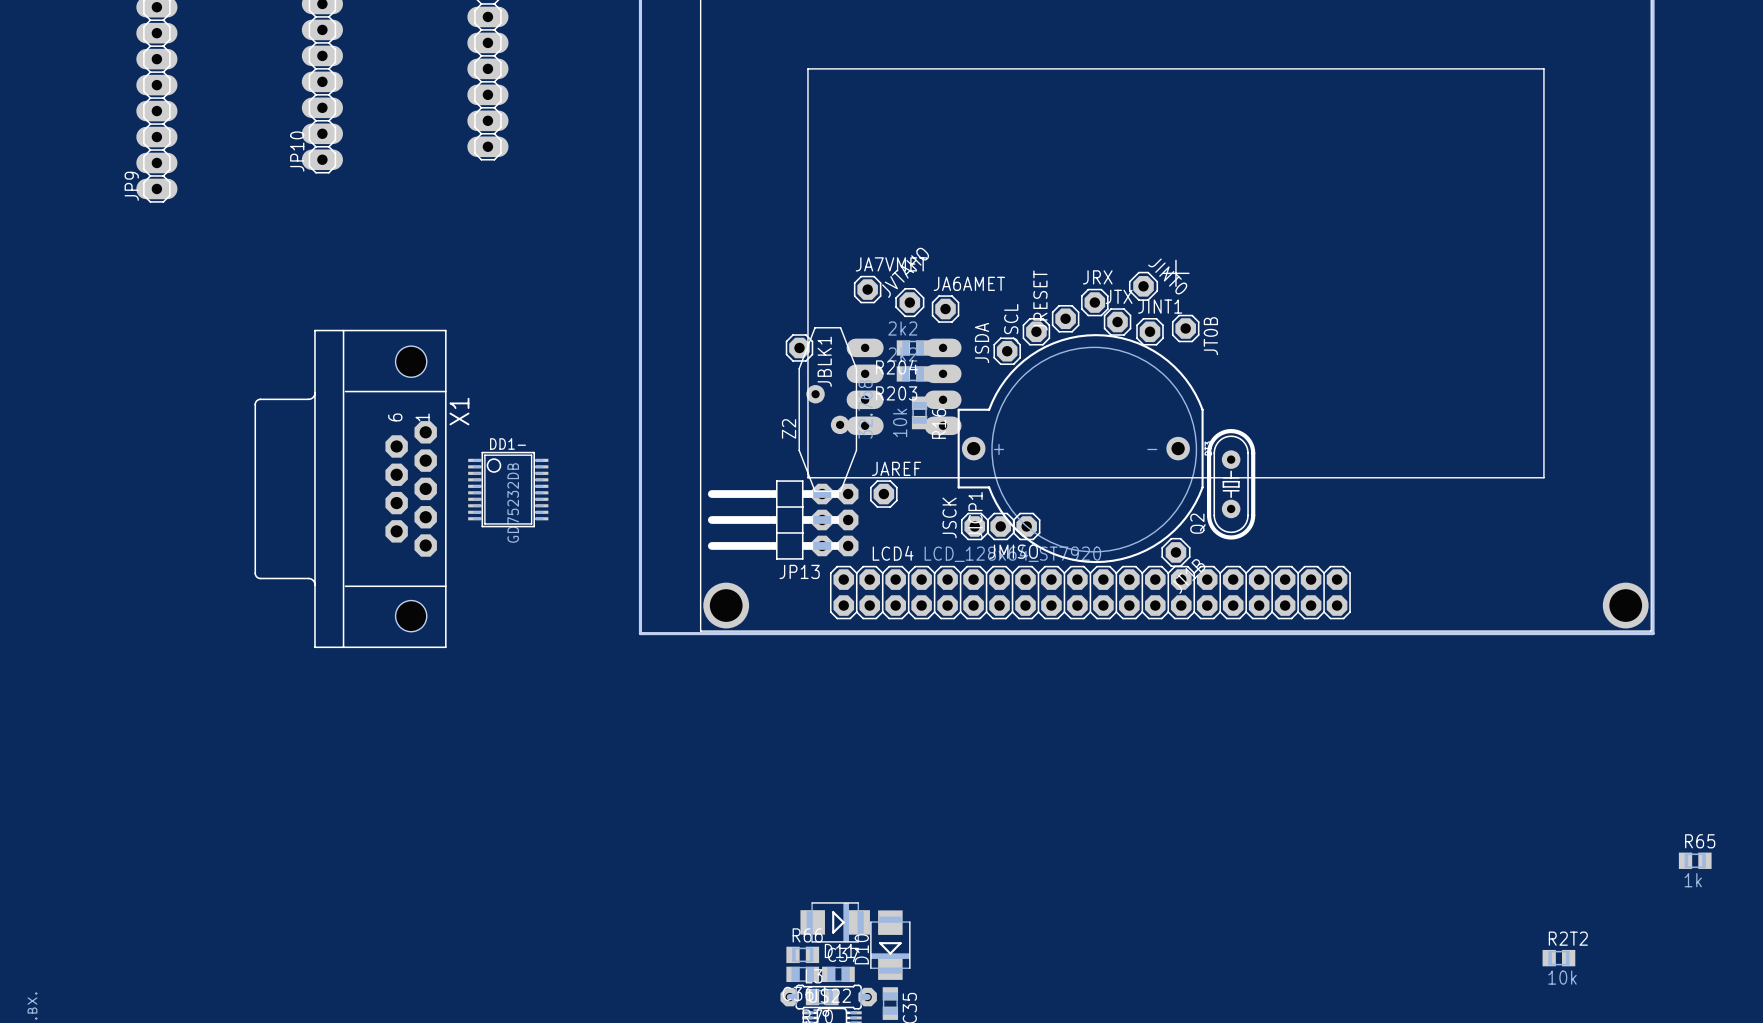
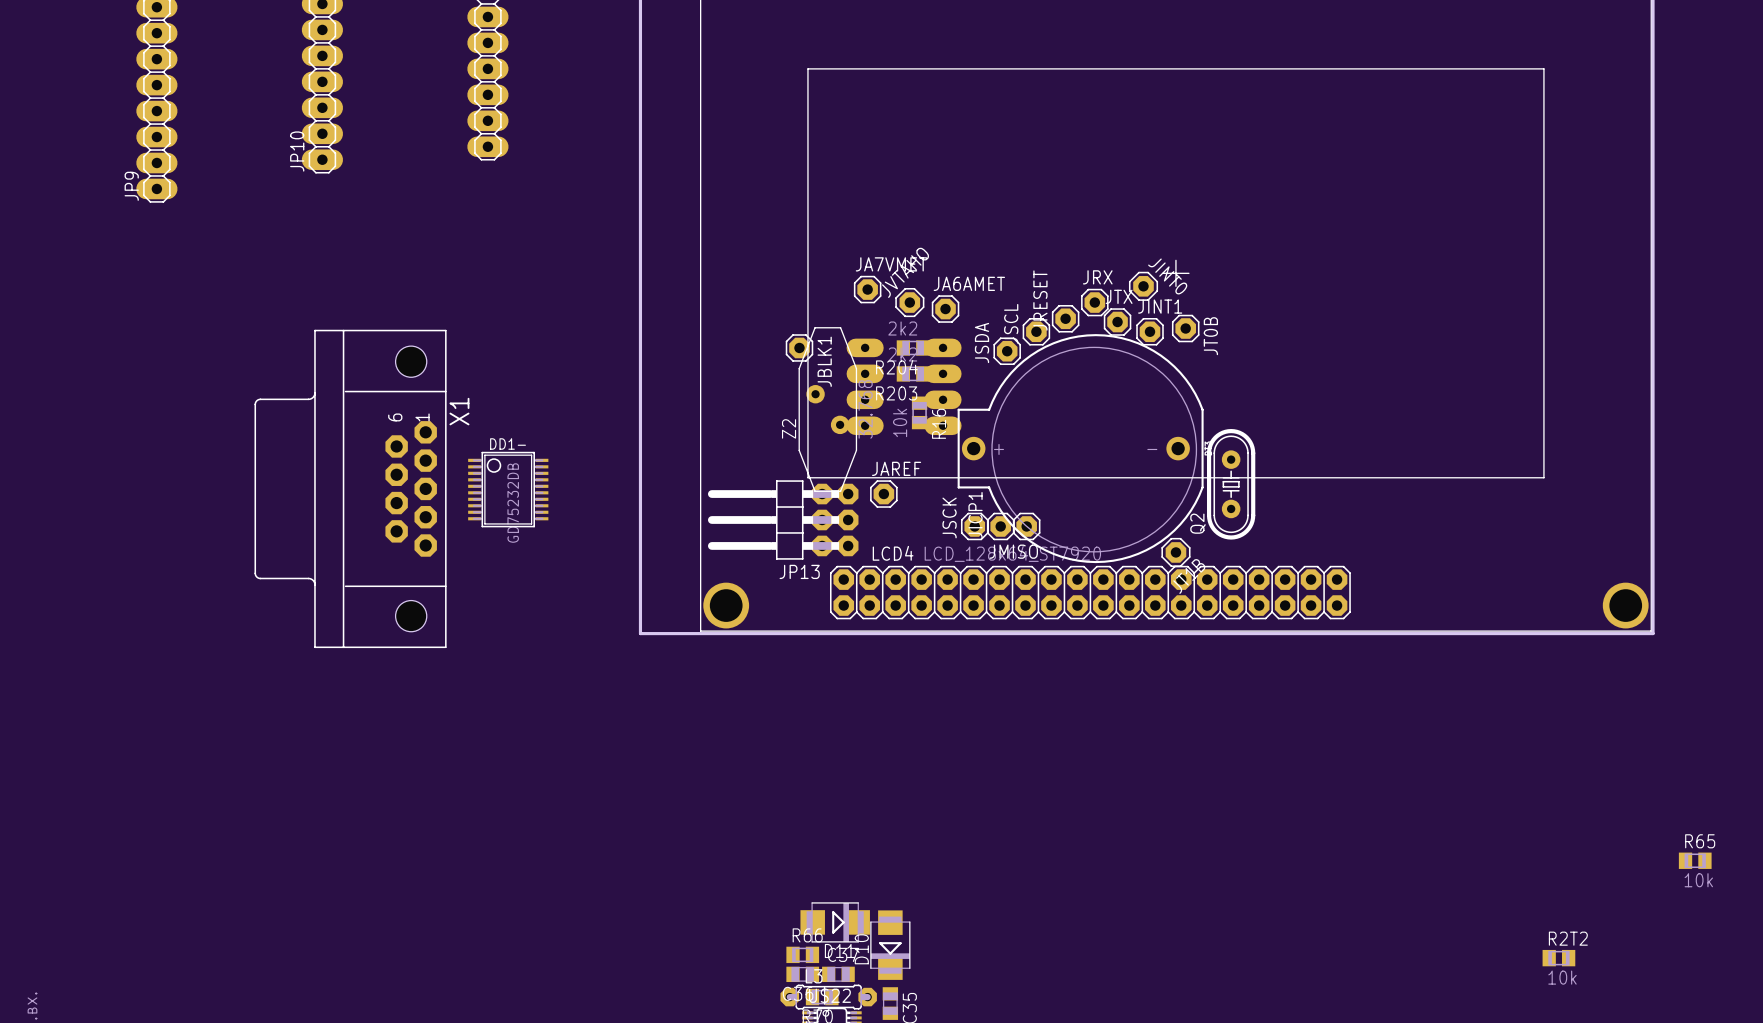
R65 value: 1k (1693, 880) -> 10k (1698, 880)

